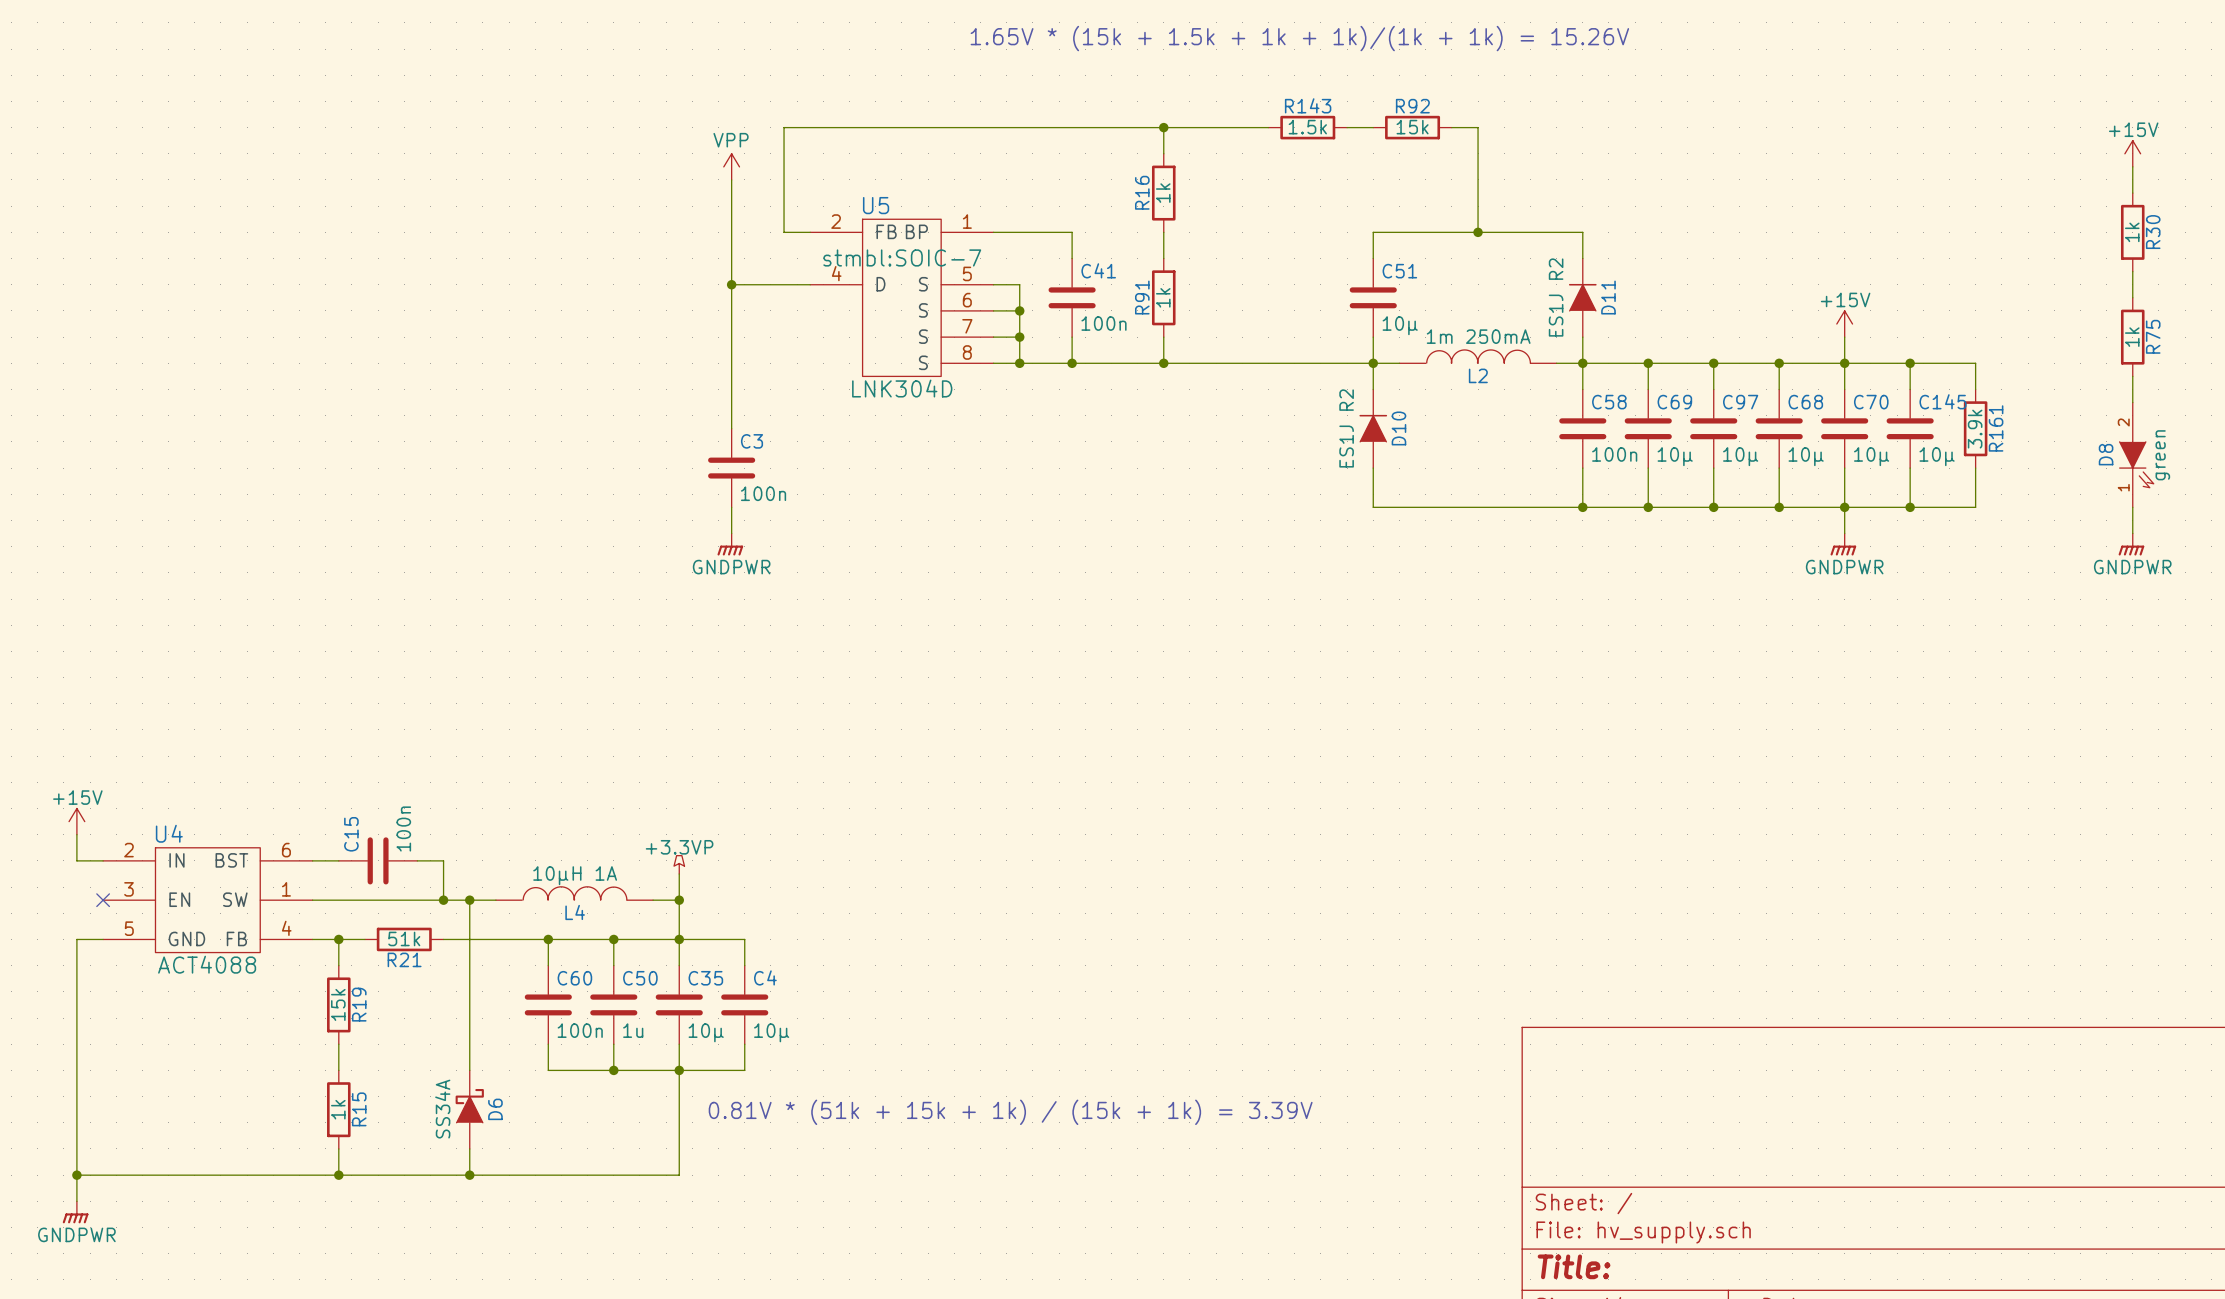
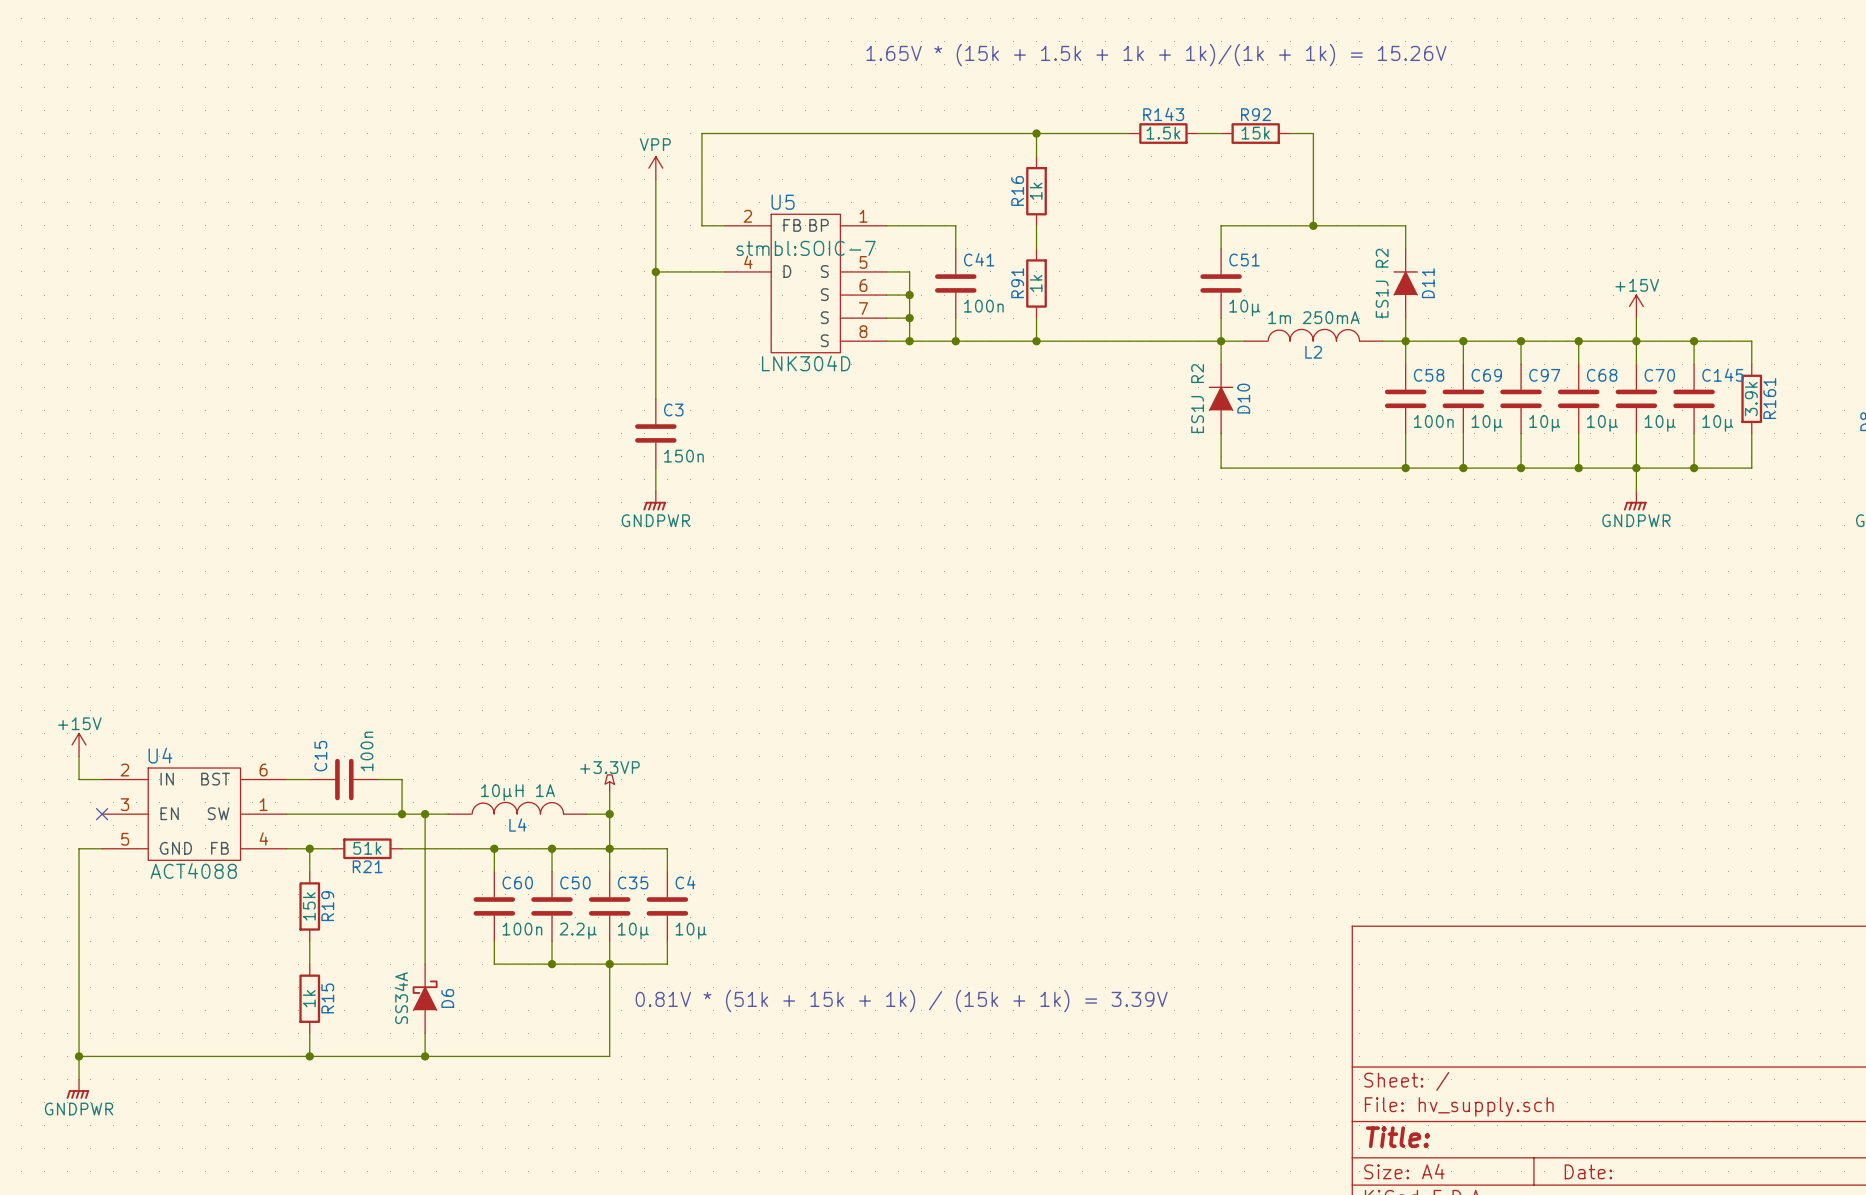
C3 value: 100n (763, 493) -> 150n (683, 456)
C50 value: 1u (633, 1030) -> 2.2µ (578, 931)

